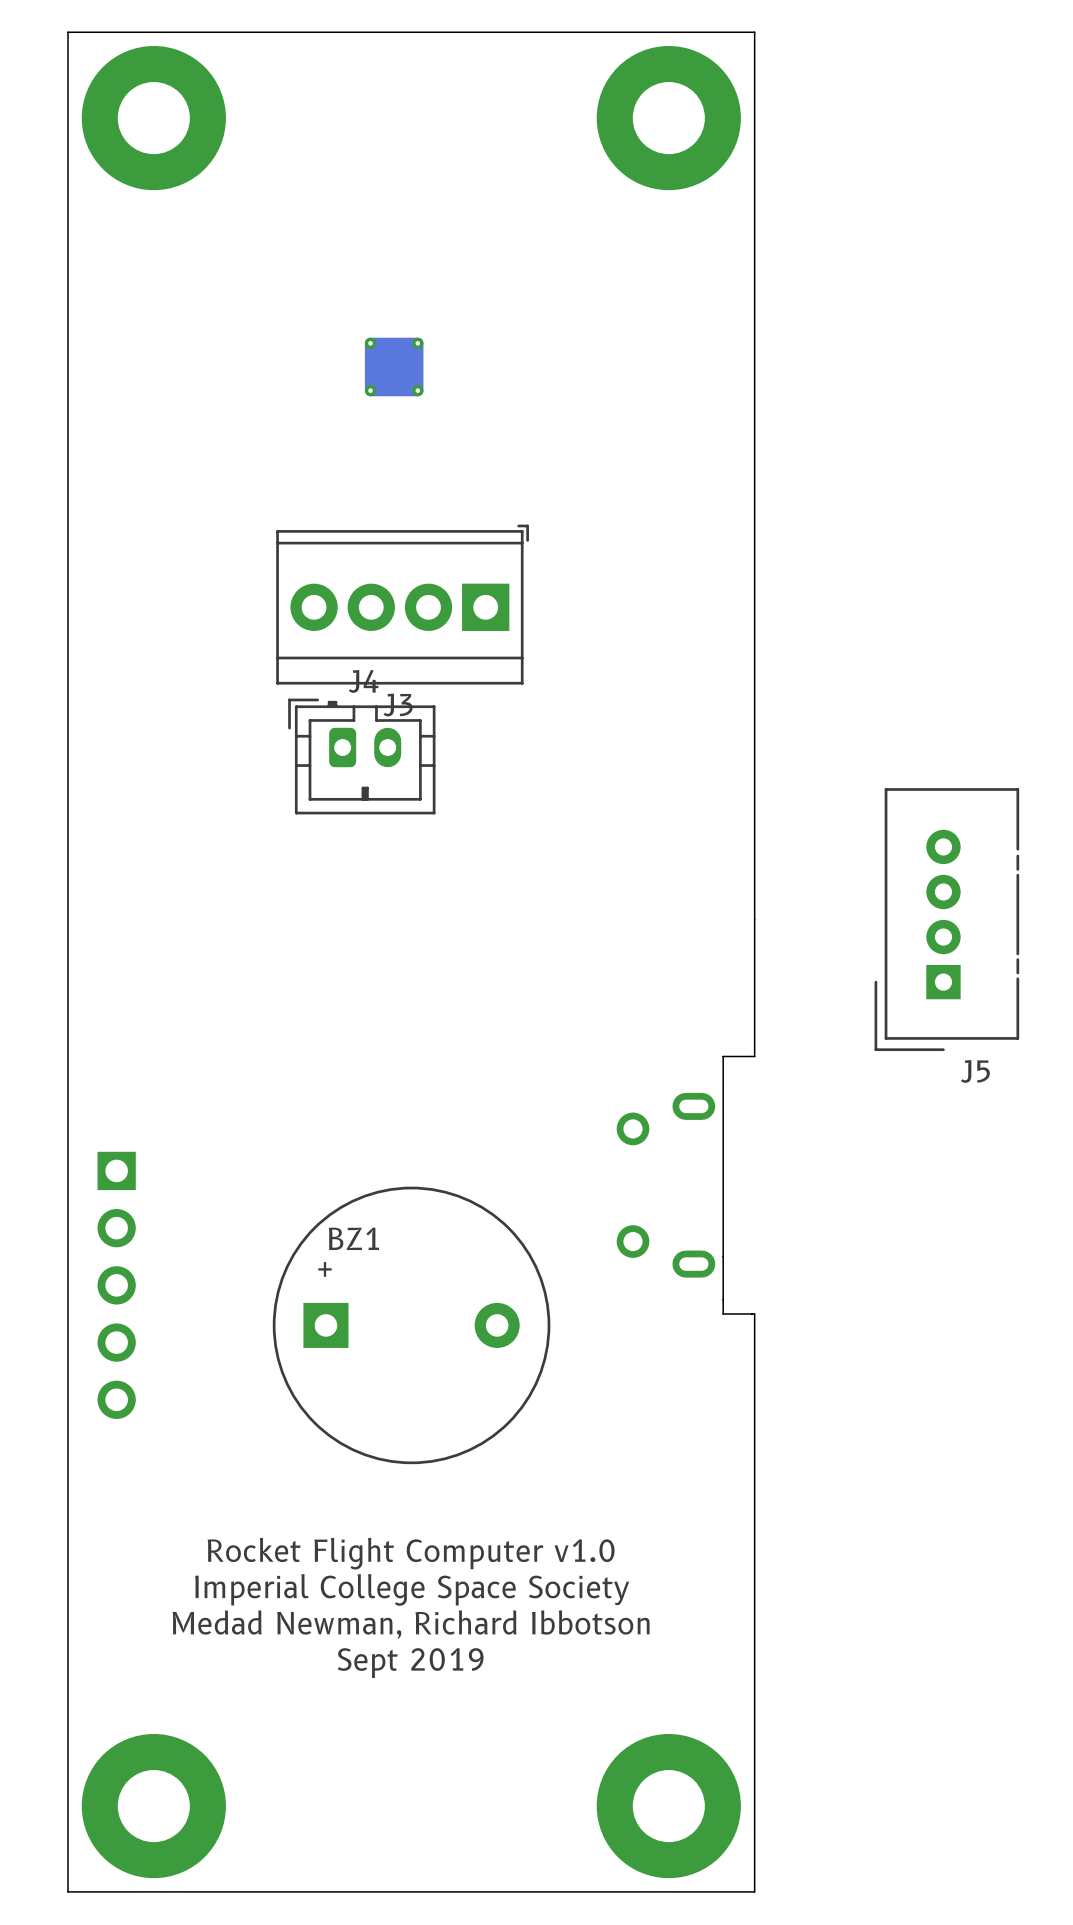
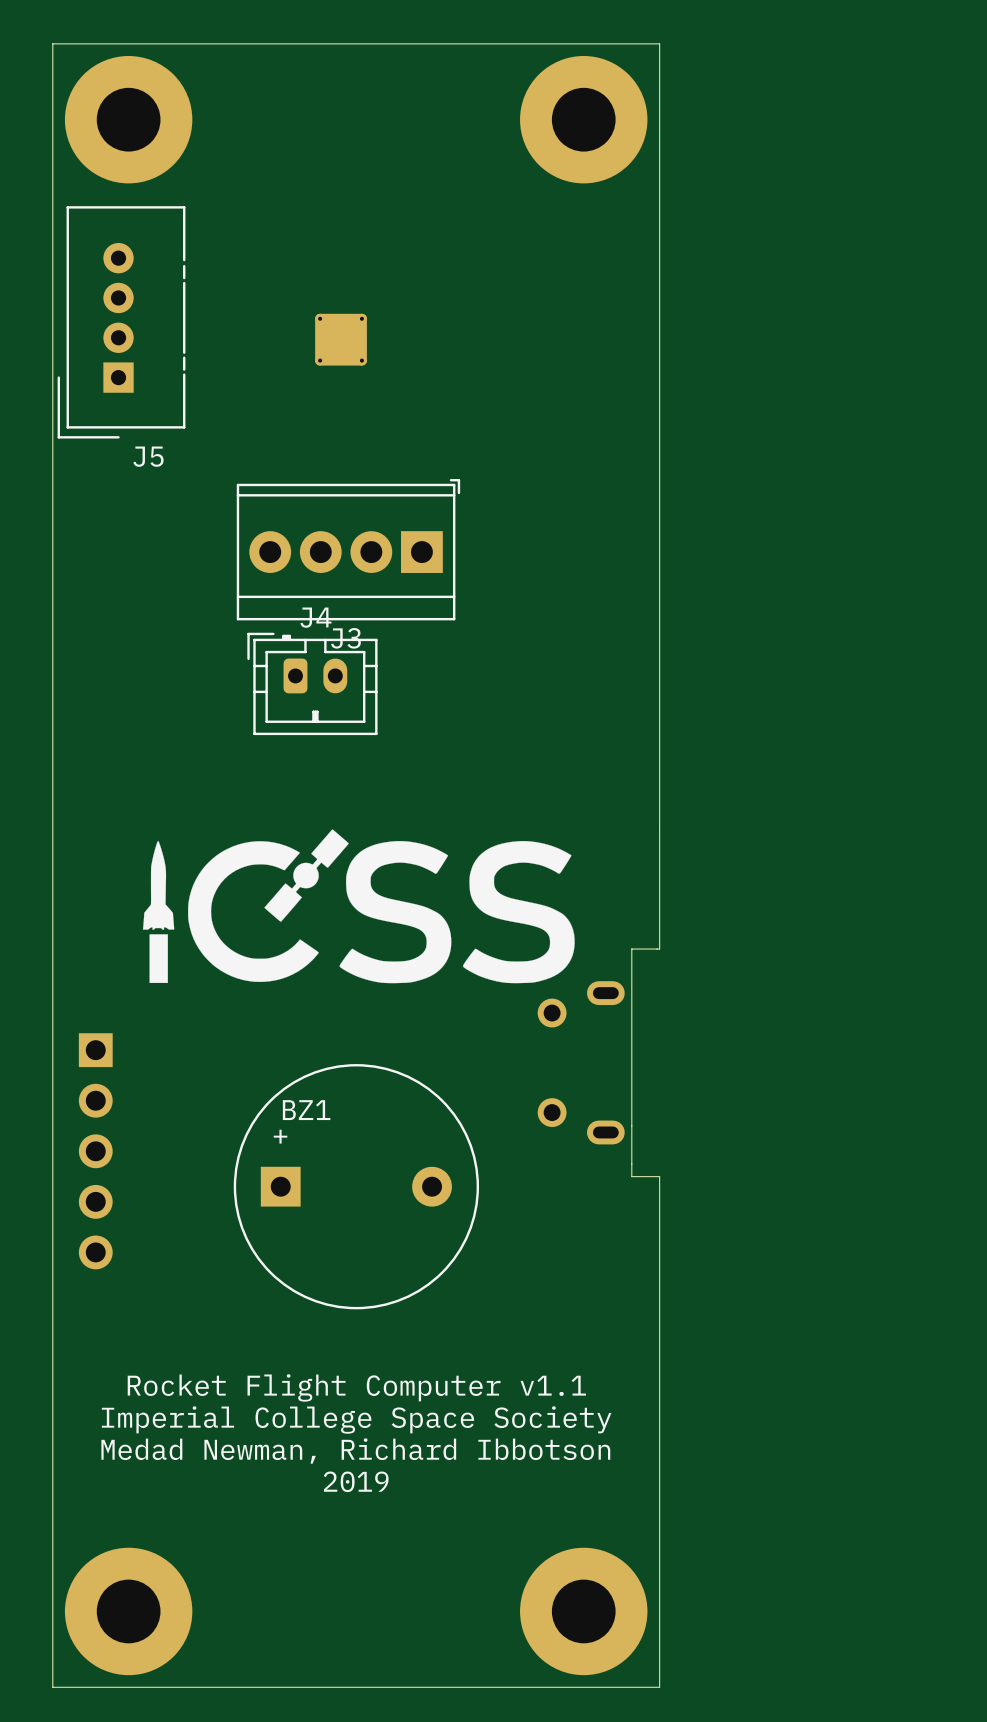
J5 position: (946, 919) -> (121, 322)
drawing: none -> [142, 829, 575, 984]
text: Rocket Flight Computer v1.0 (411, 1553) -> Rocket Flight Computer v1.1 (356, 1387)
text: Sept 2019 (410, 1663) -> 2019 (356, 1481)

